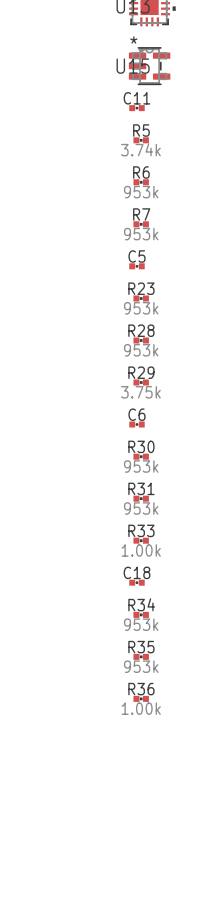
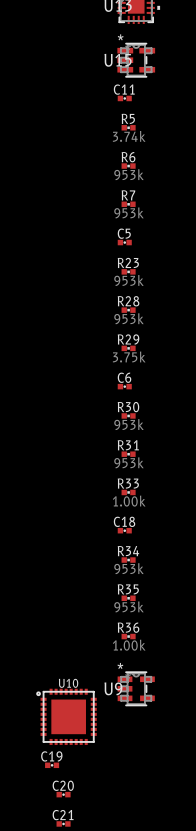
U9: none -> (136, 688)
U10: none -> (66, 716)
C19: none -> (52, 765)
C20: none -> (63, 794)
C21: none -> (63, 823)

